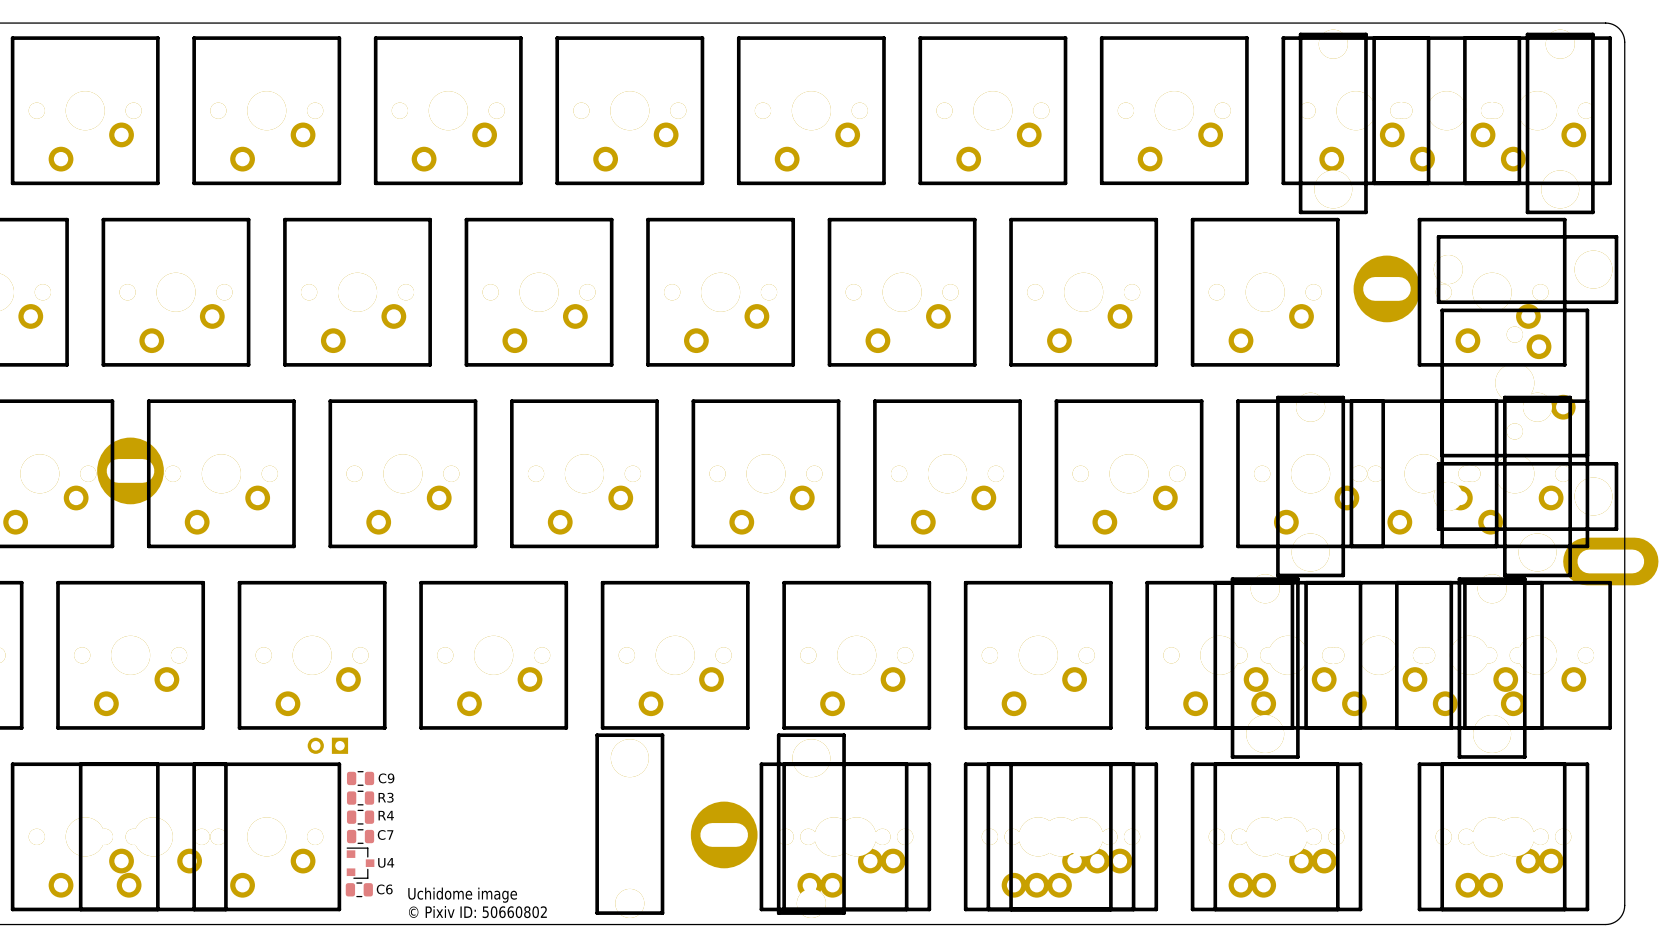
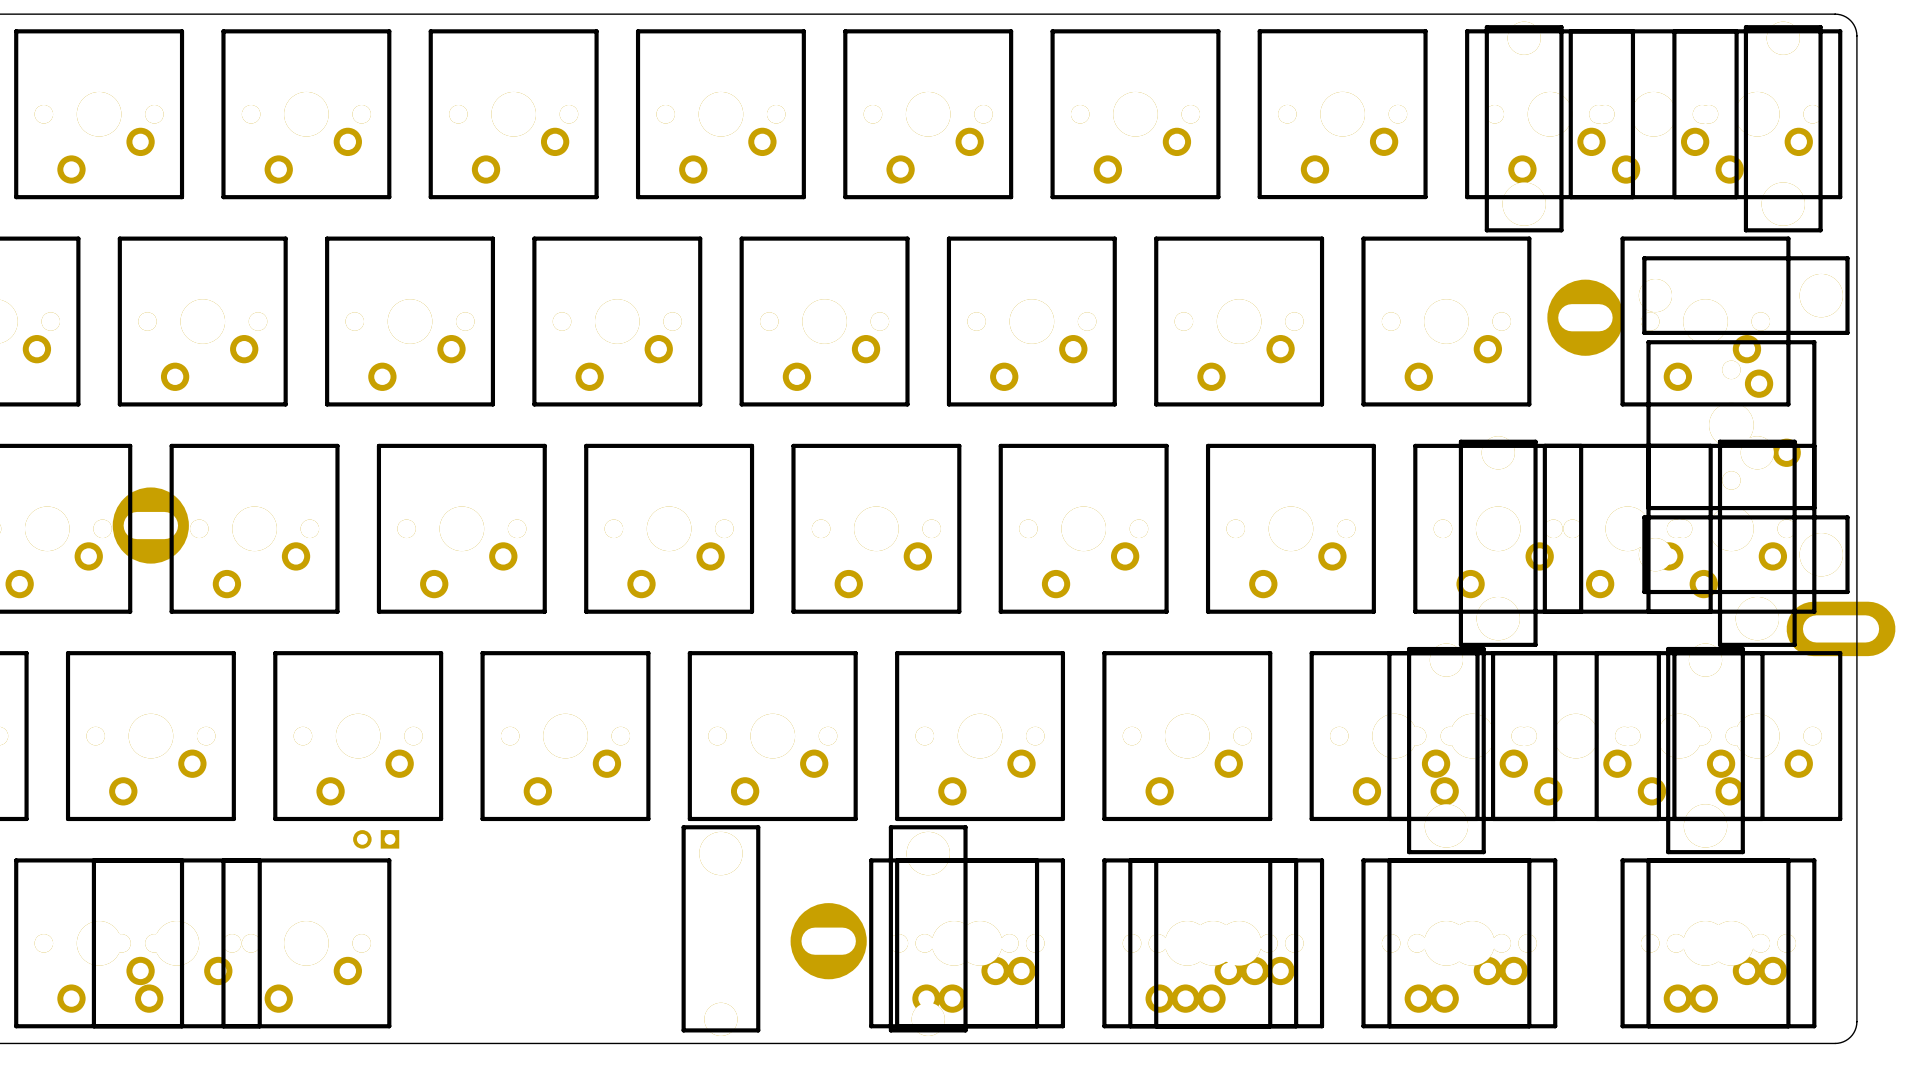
C9: (360, 778) -> none
R3: (360, 798) -> none
R4: (360, 817) -> none
C7: (360, 836) -> none
U4: (360, 863) -> none
C6: (359, 889) -> none
text: Uchidome image (462, 895) -> none
text: © Pixiv ID: 50660802 (477, 912) -> none

